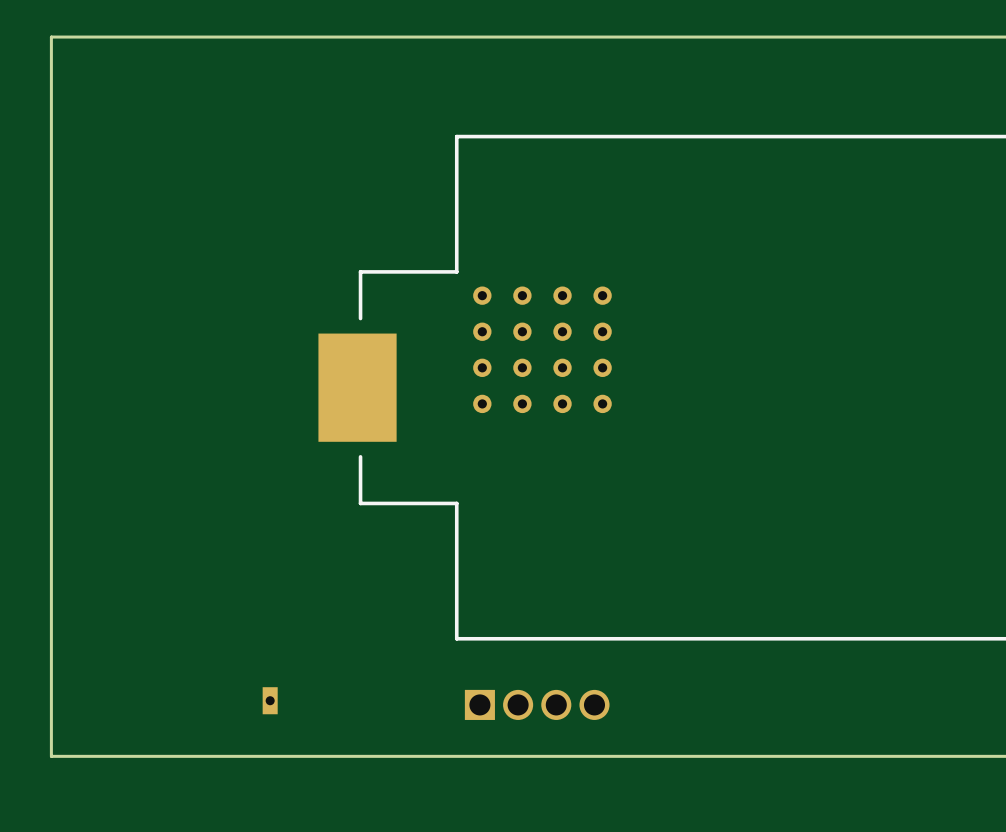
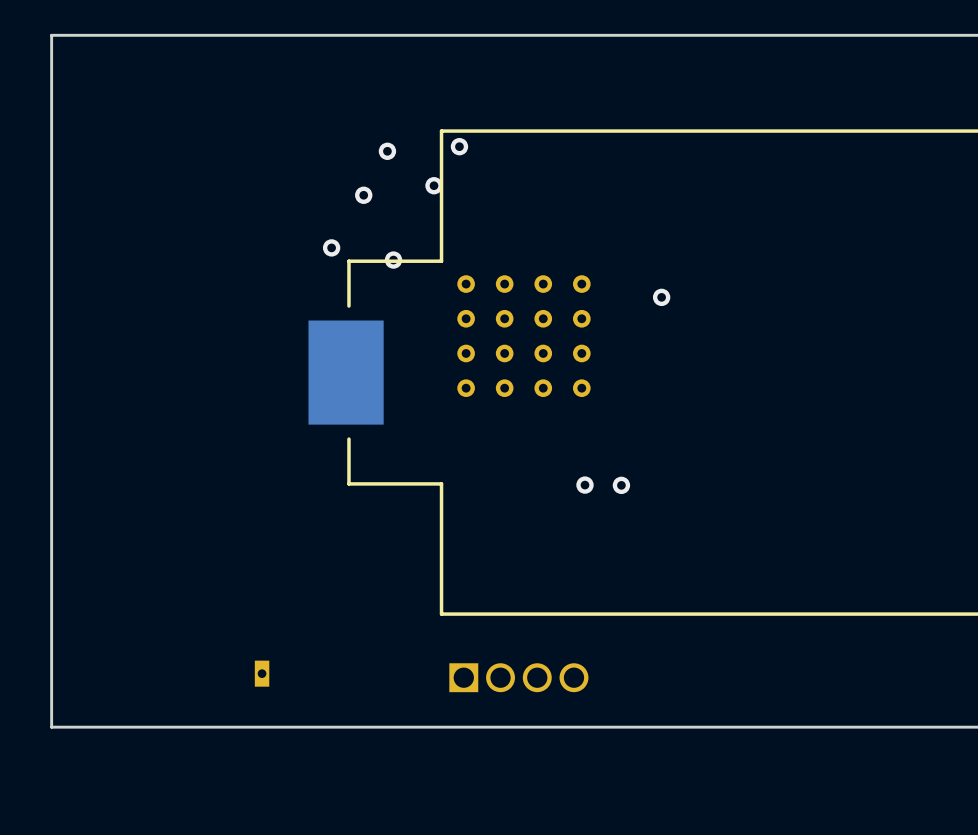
via: none -> (459, 146)
via: none -> (387, 151)
via: none -> (434, 185)
via: none -> (363, 195)
via: none -> (331, 247)
via: none -> (393, 260)
via: none -> (661, 297)
via: none -> (584, 485)
via: none -> (621, 485)

